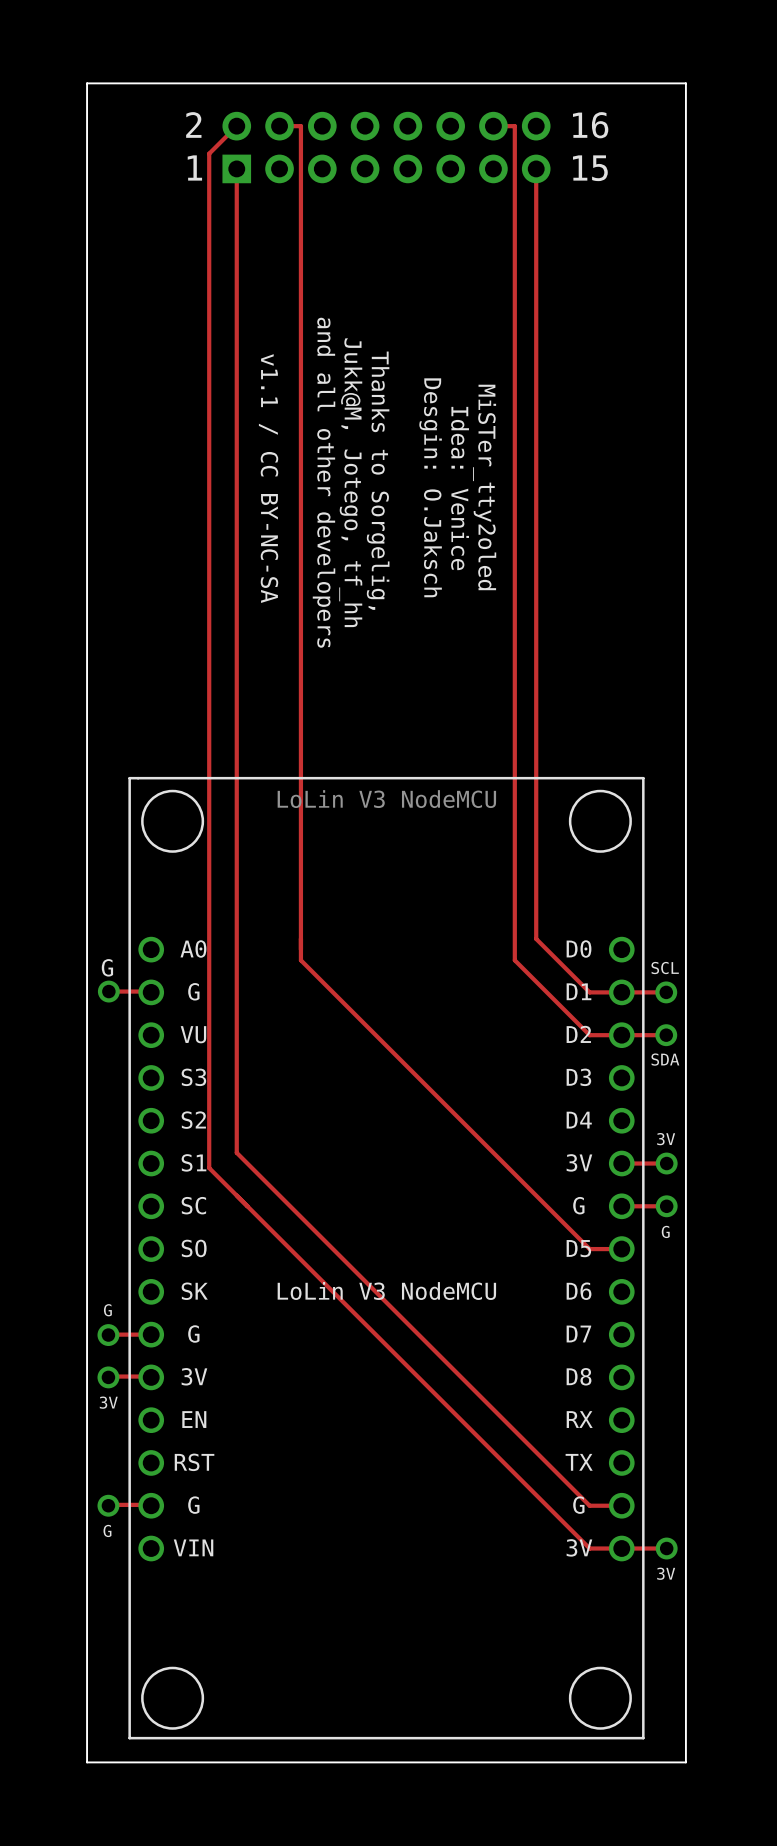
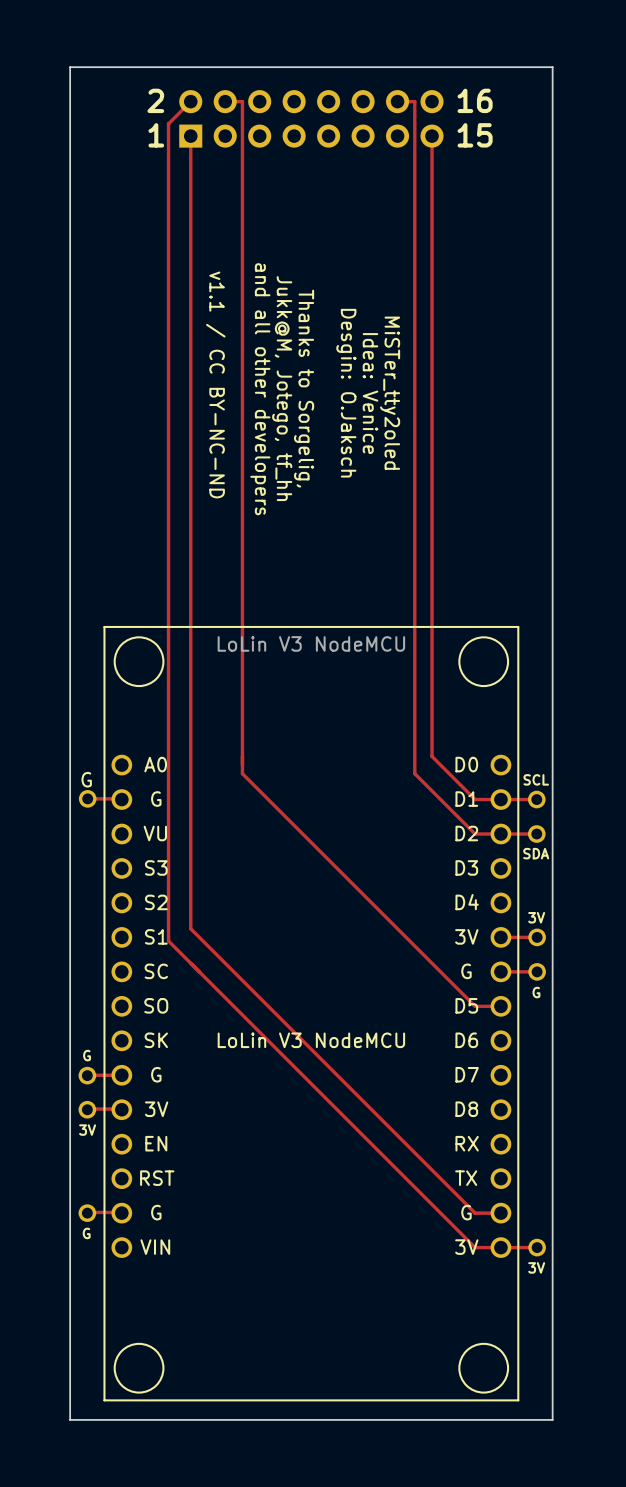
text: v1.1 / CC BY-NC-SA (268, 478) -> v1.1 / CC BY-NC-ND (215, 384)

